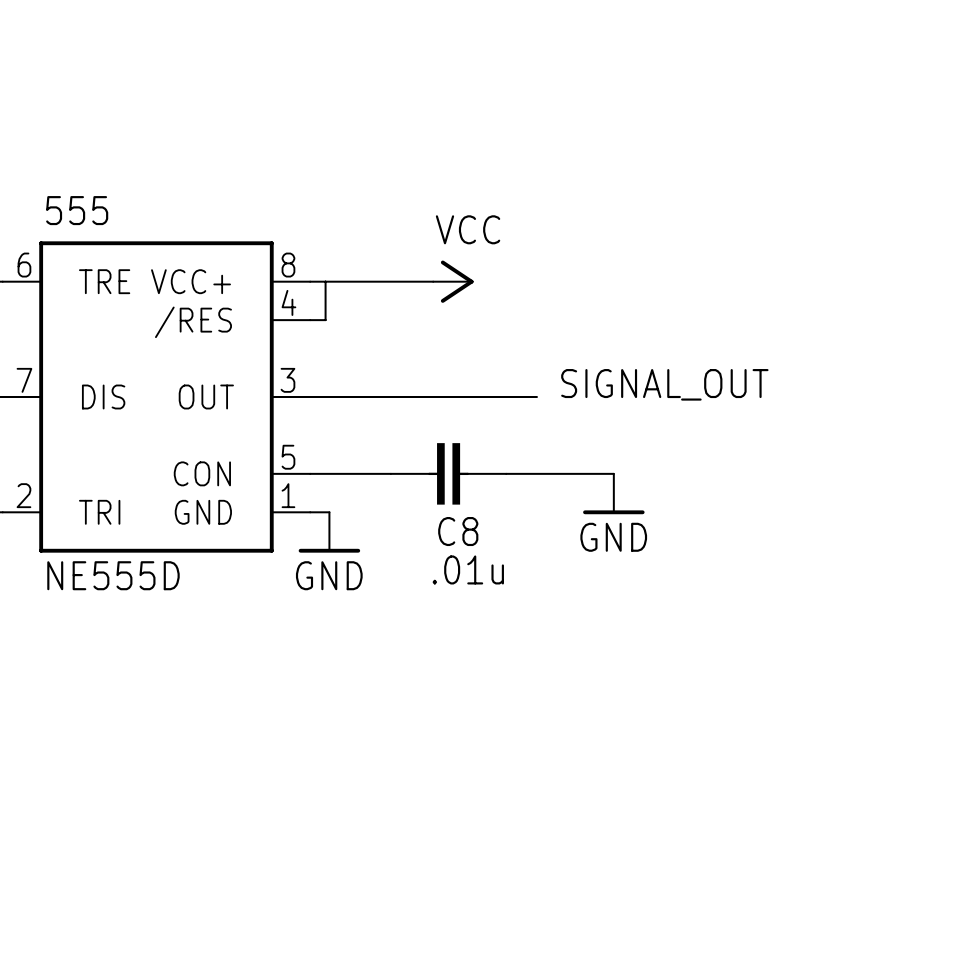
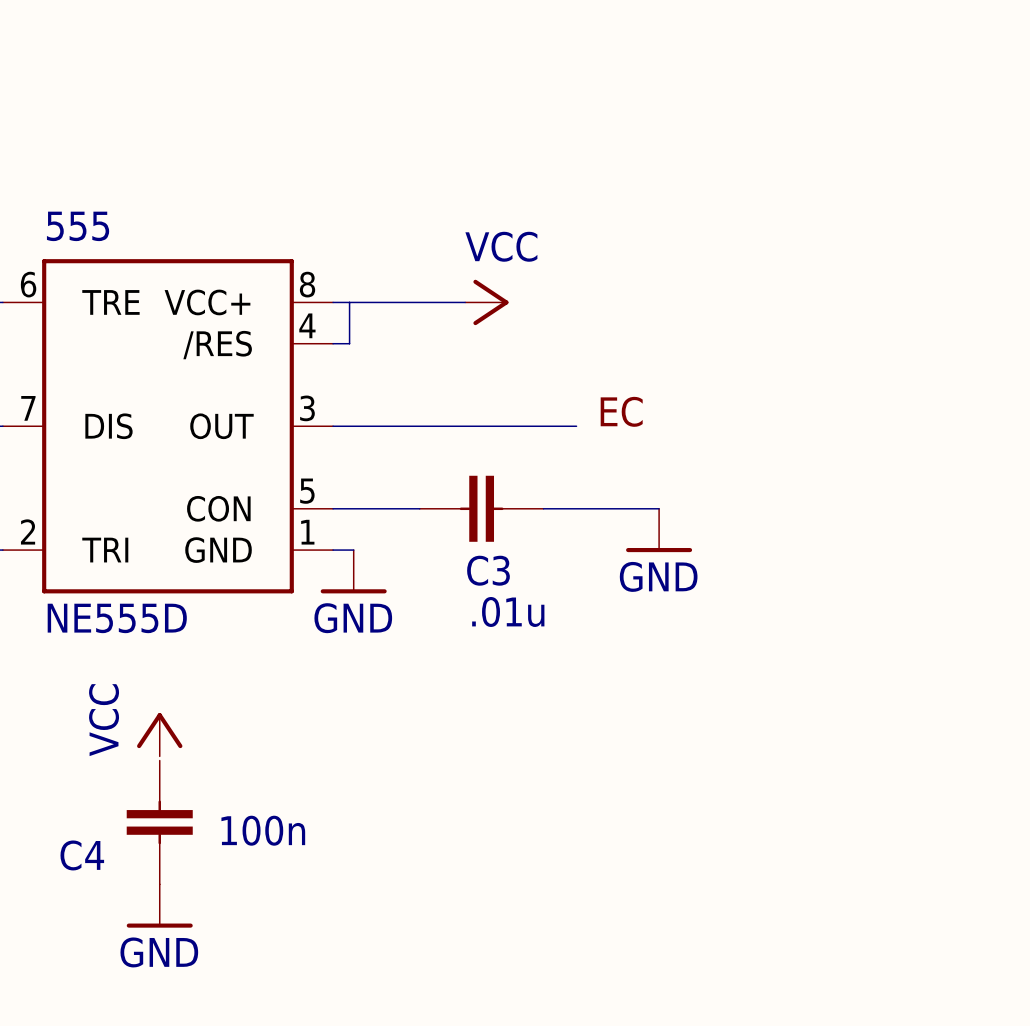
label: SIGNAL_OUT (664, 384) -> EC (621, 411)
C8 name: C8 (458, 531) -> C3 (488, 570)
power symbol: none -> VCC (159, 734)
C4: none -> 100n (159, 822)
power symbol: none -> GND (159, 905)

